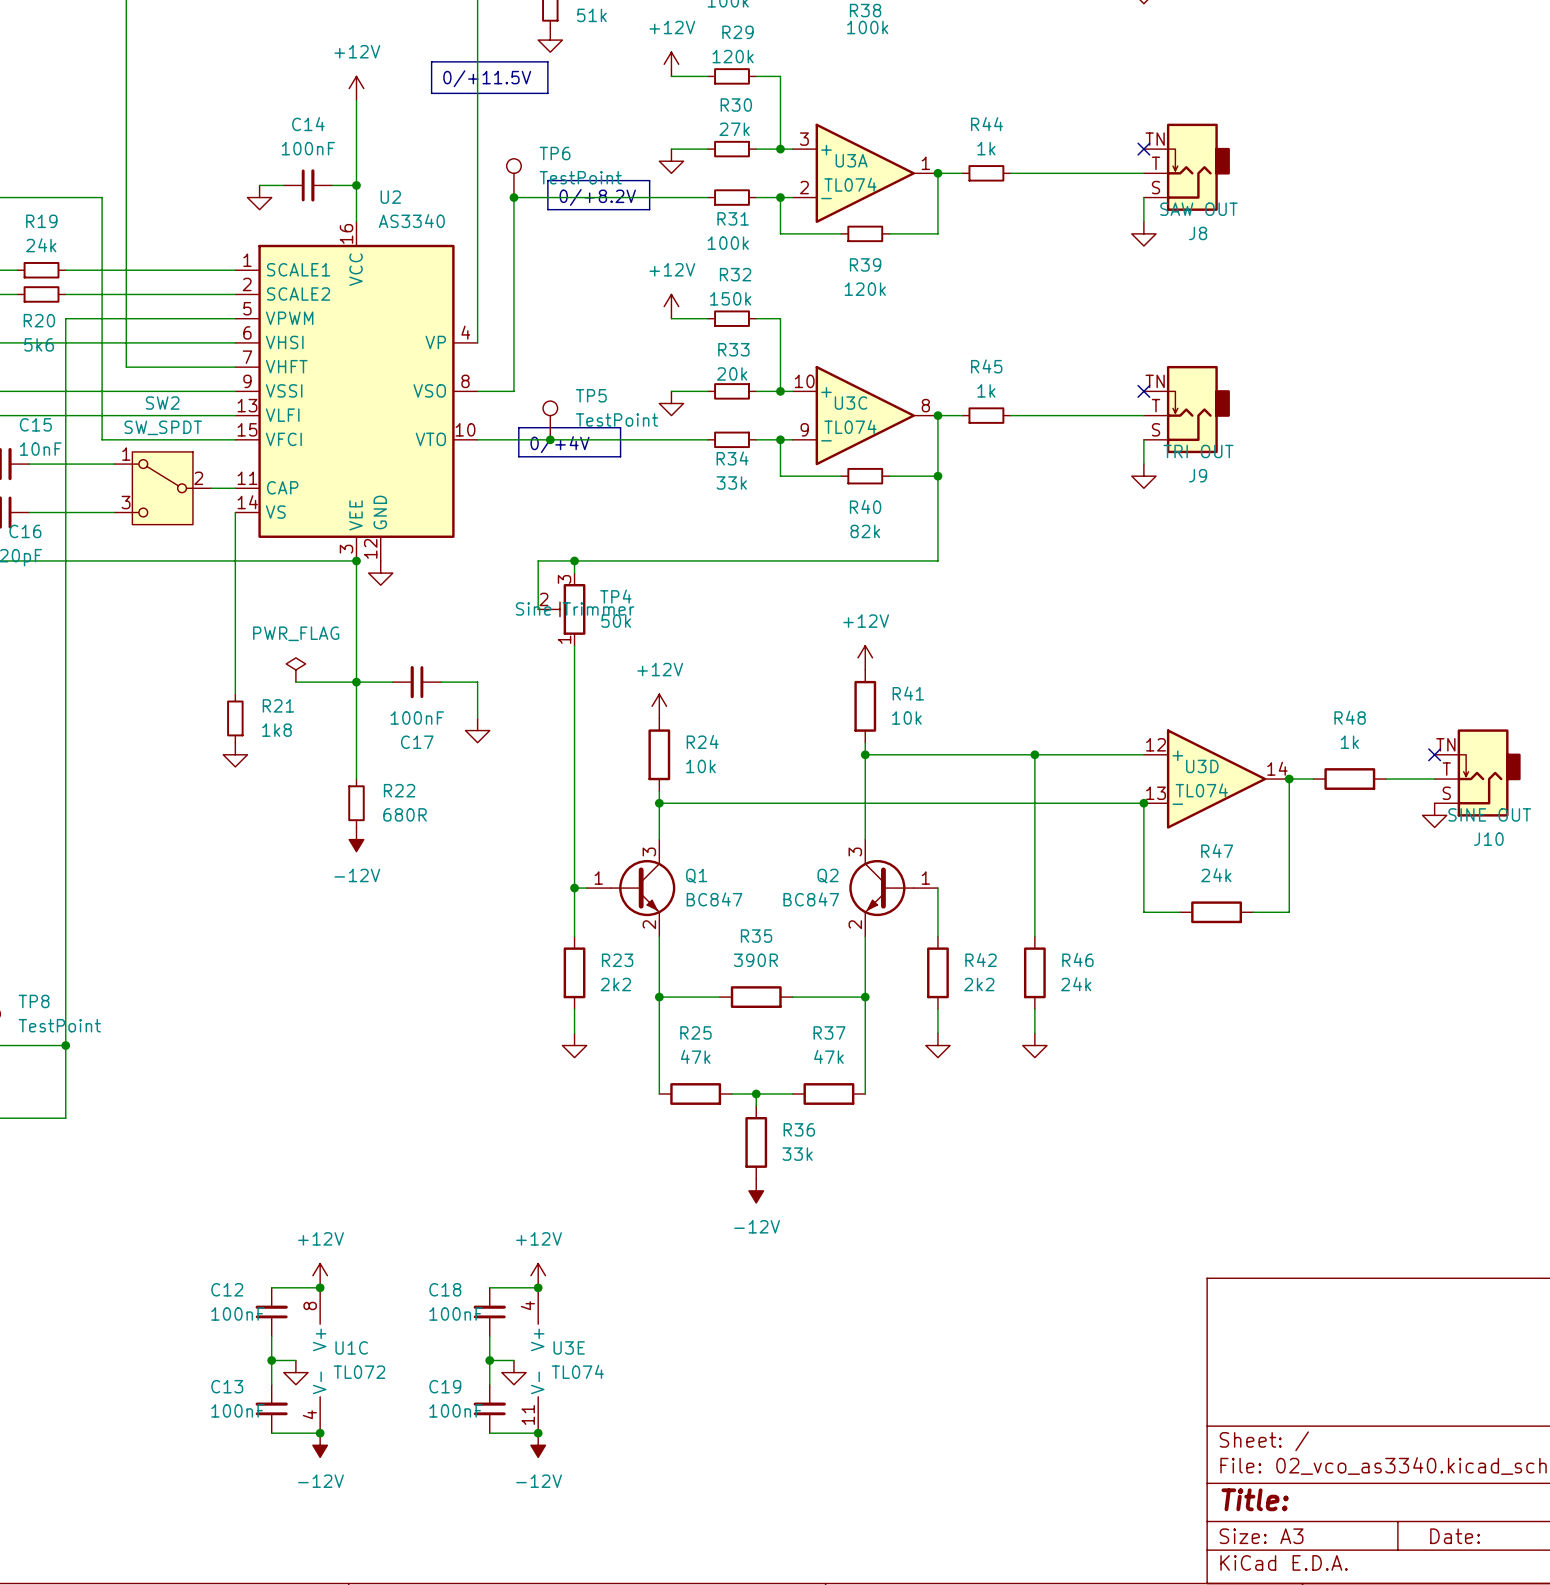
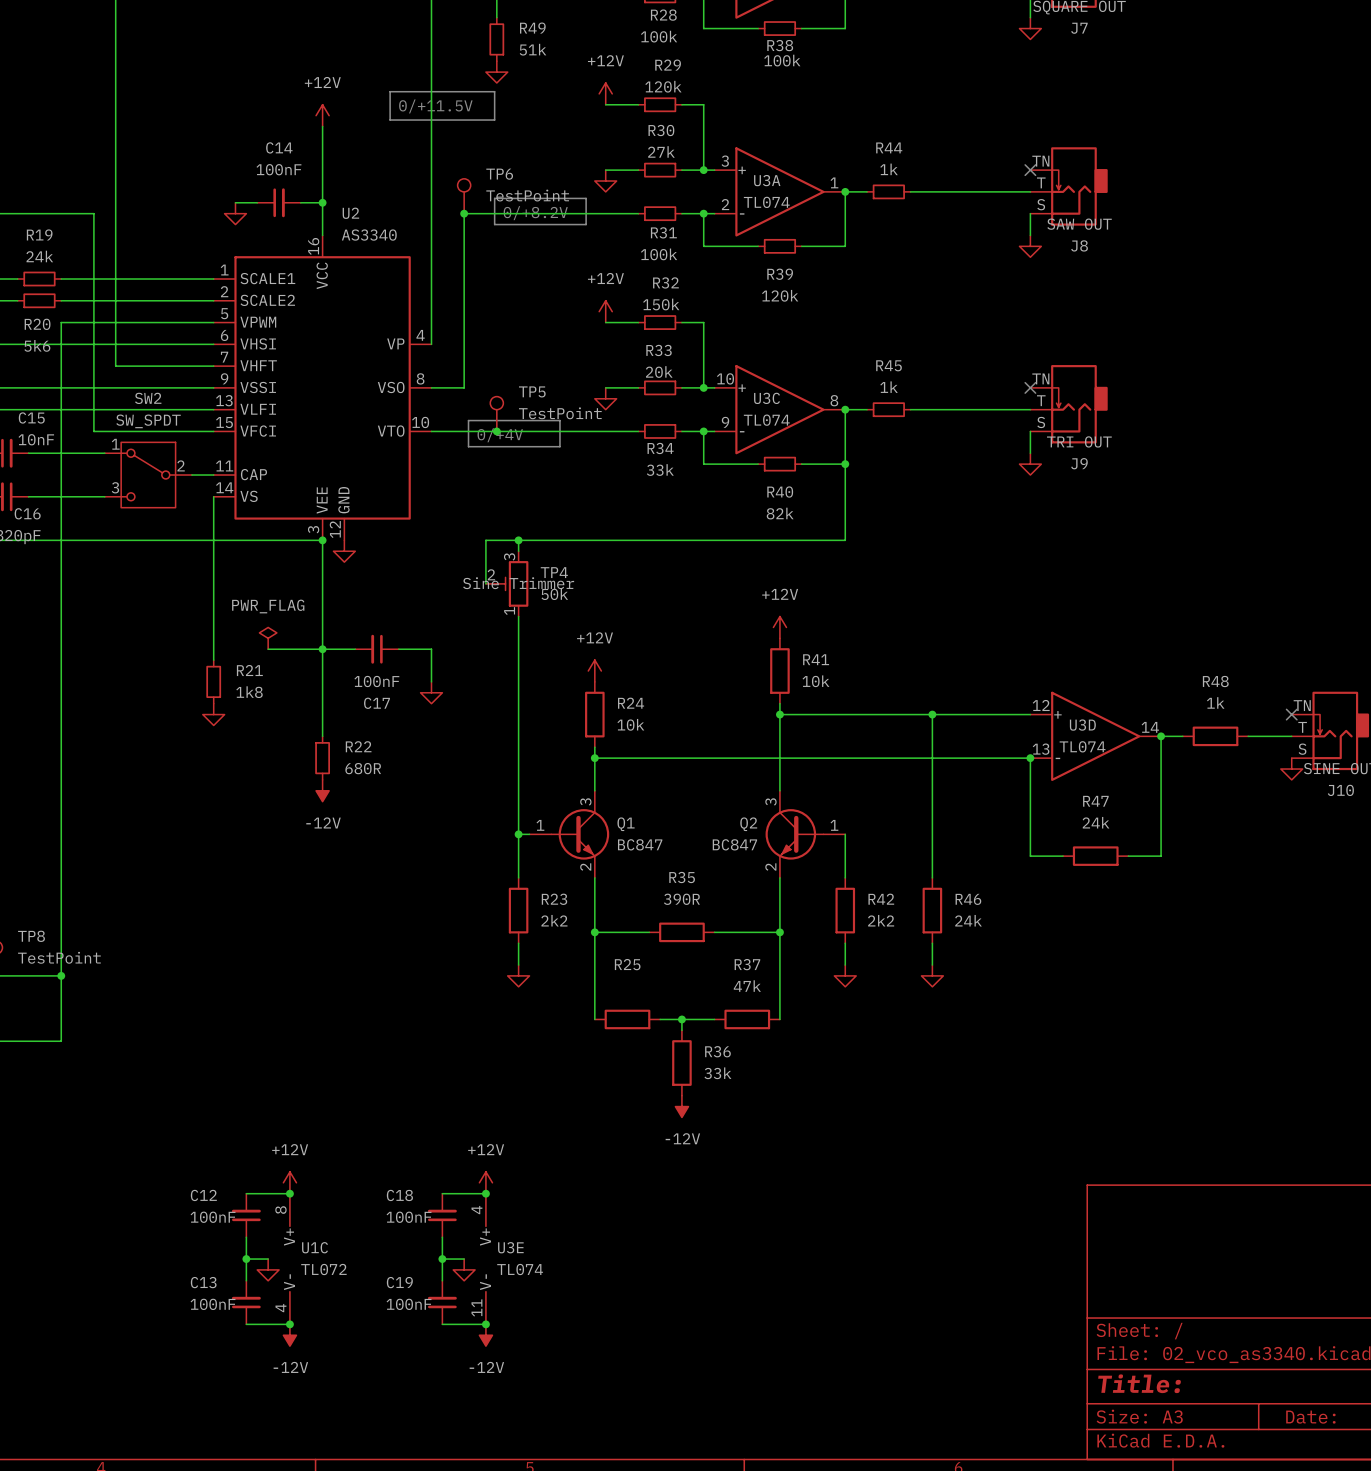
R25 value: 47k (695, 1056) -> none

